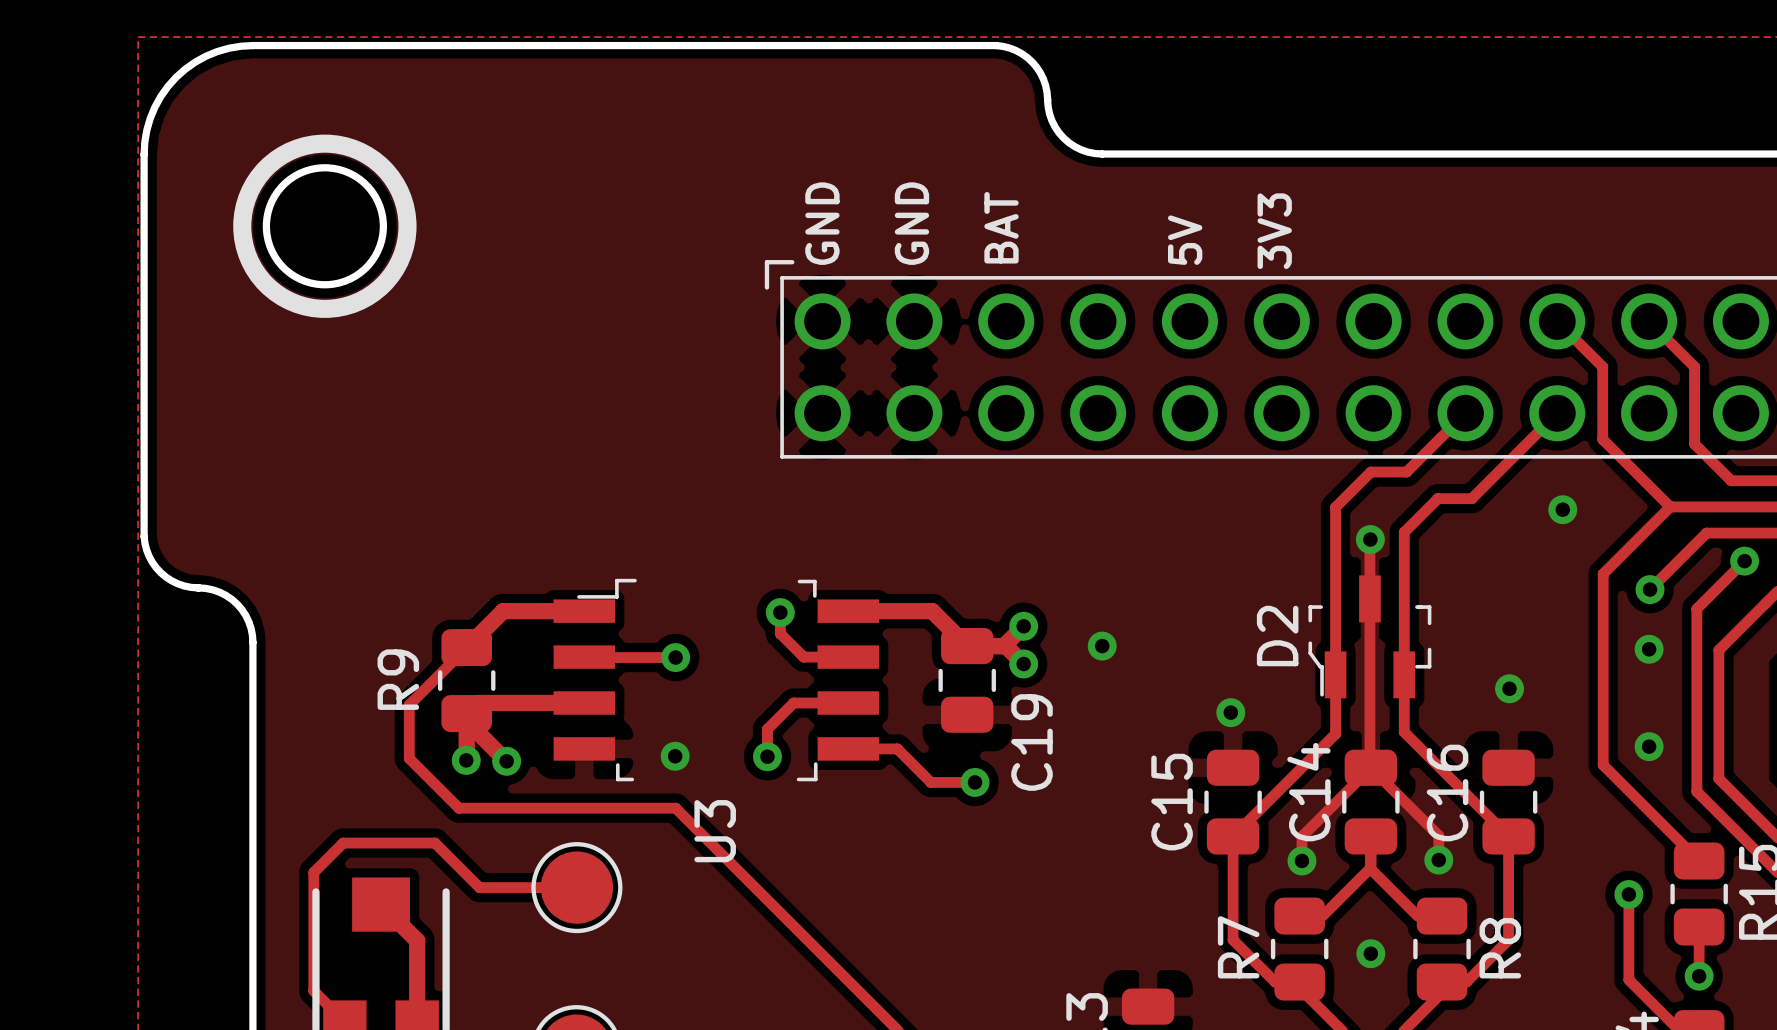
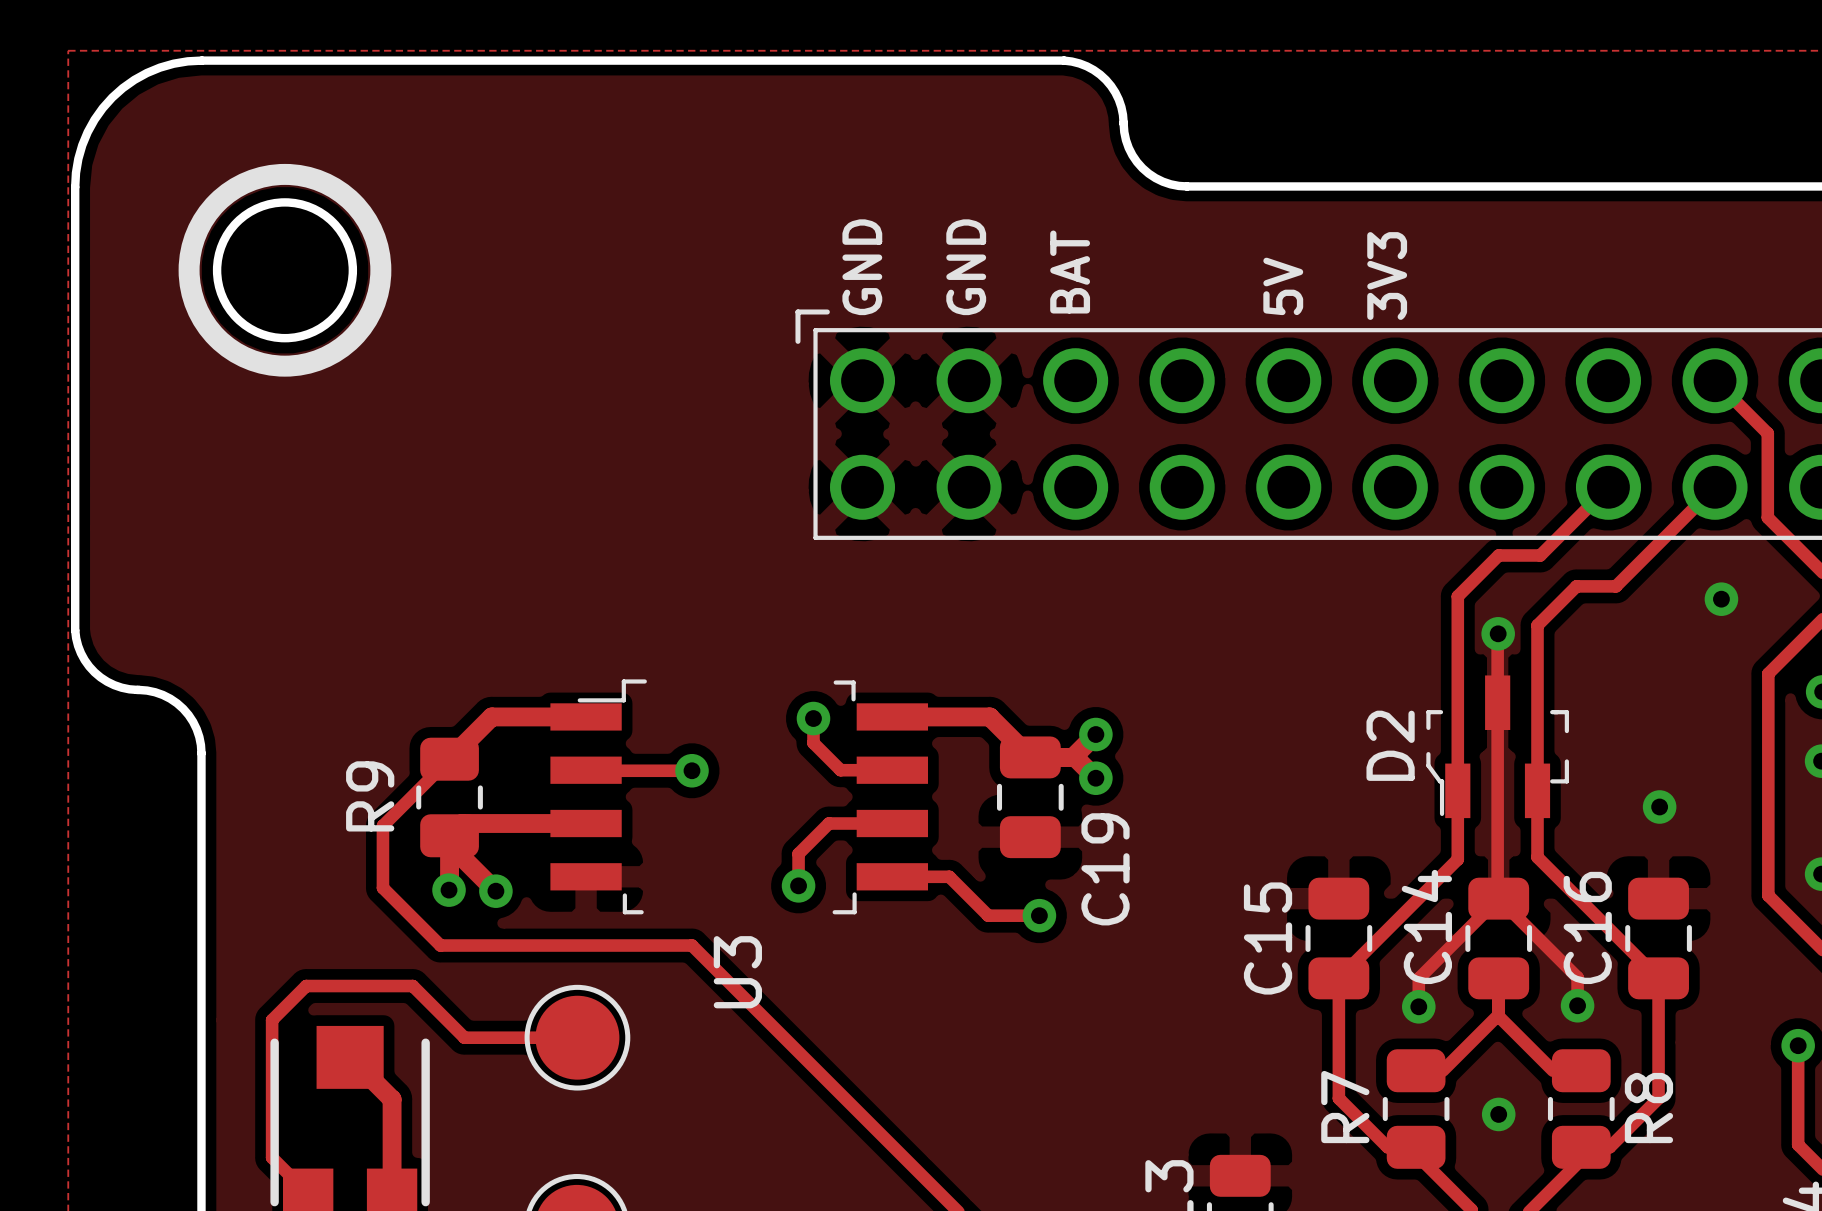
via: (1102, 646) -> none
via: (1230, 712) -> none
via: (675, 756) -> none

